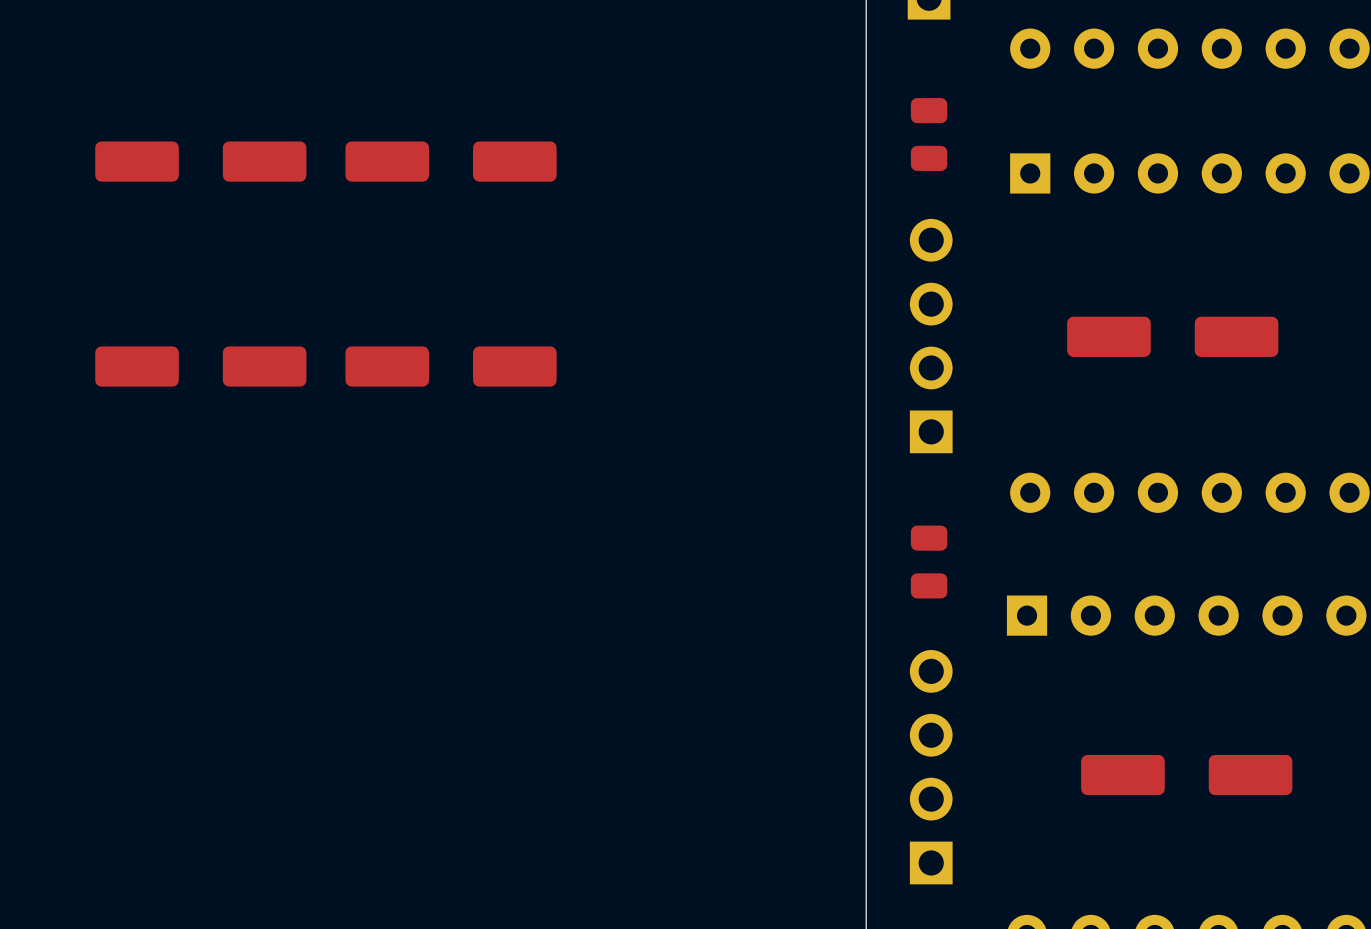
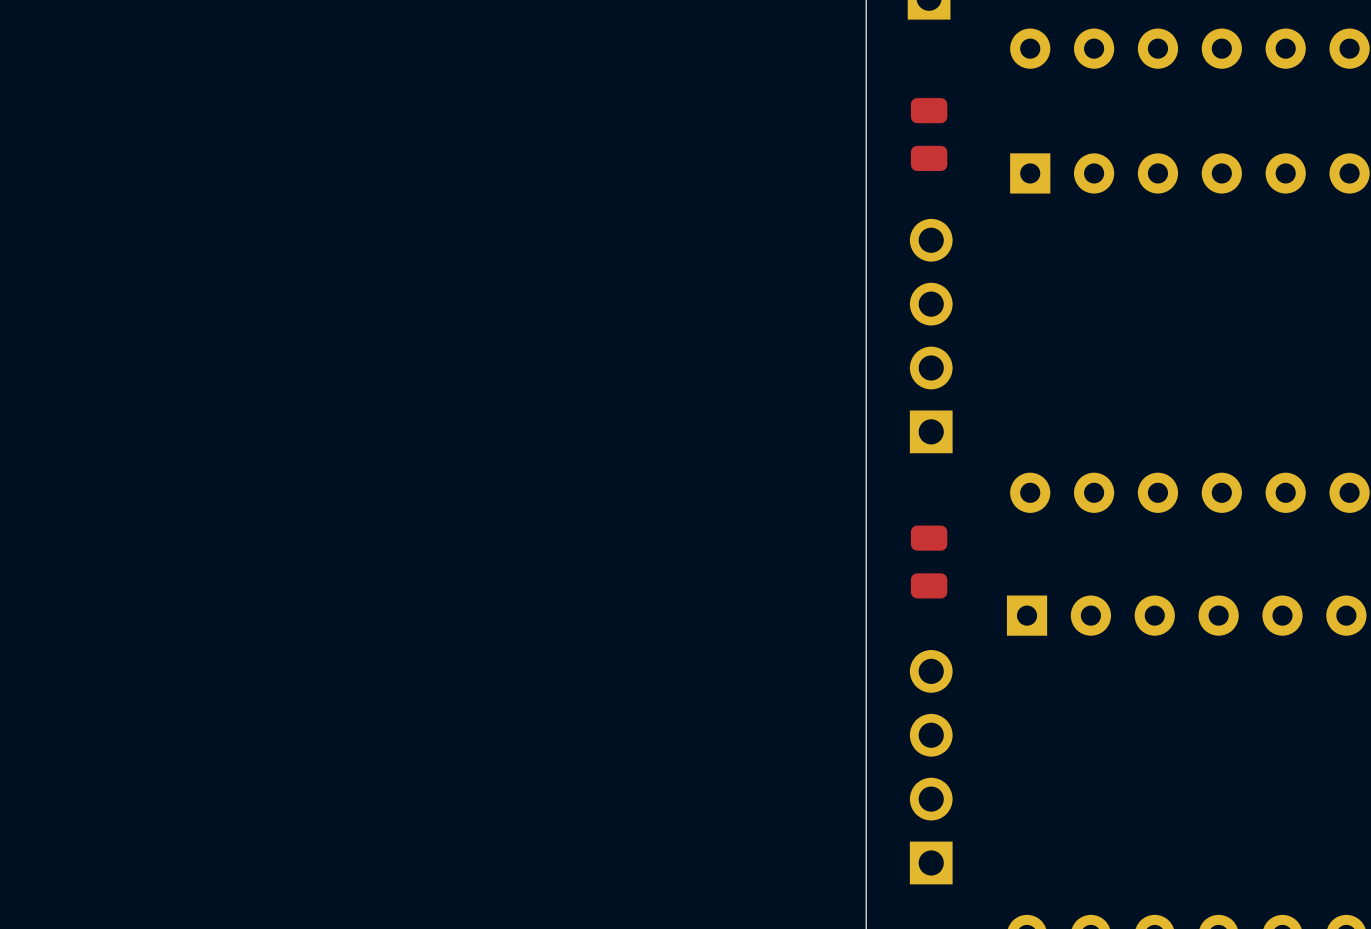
part: (200, 161) -> none
part: (451, 161) -> none
part: (1172, 336) -> none
part: (200, 366) -> none
part: (451, 366) -> none
part: (1186, 775) -> none

